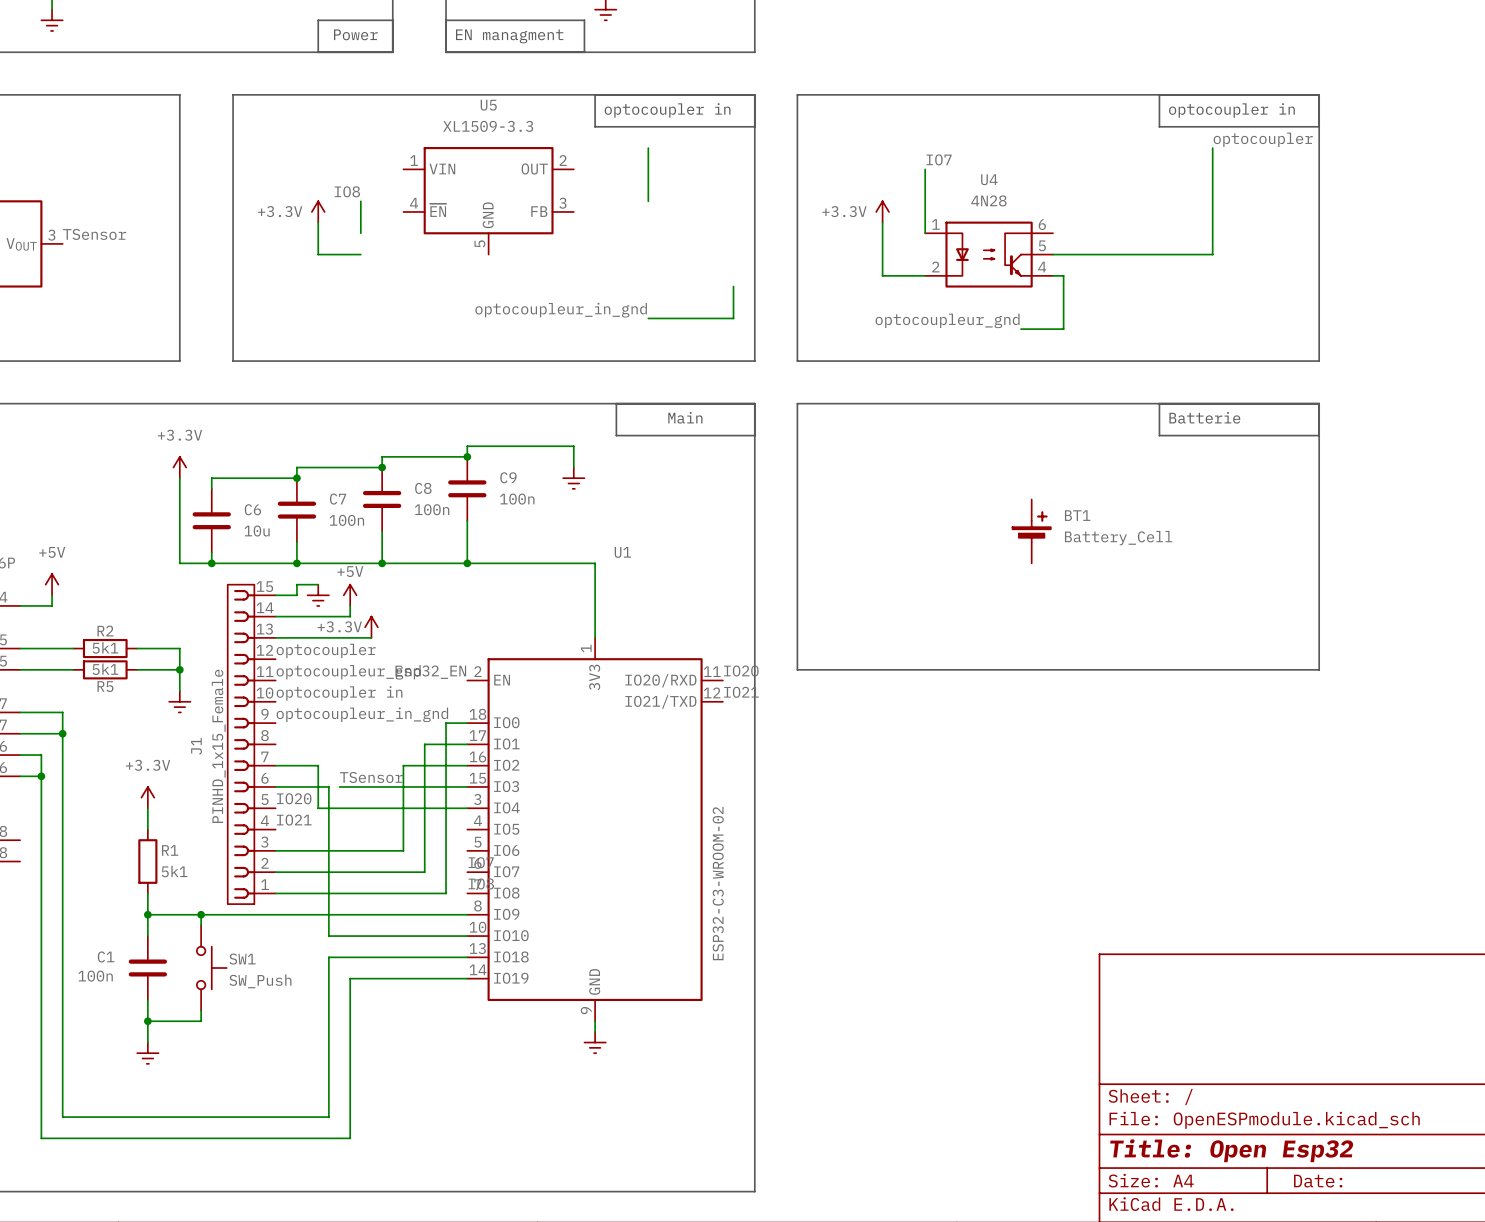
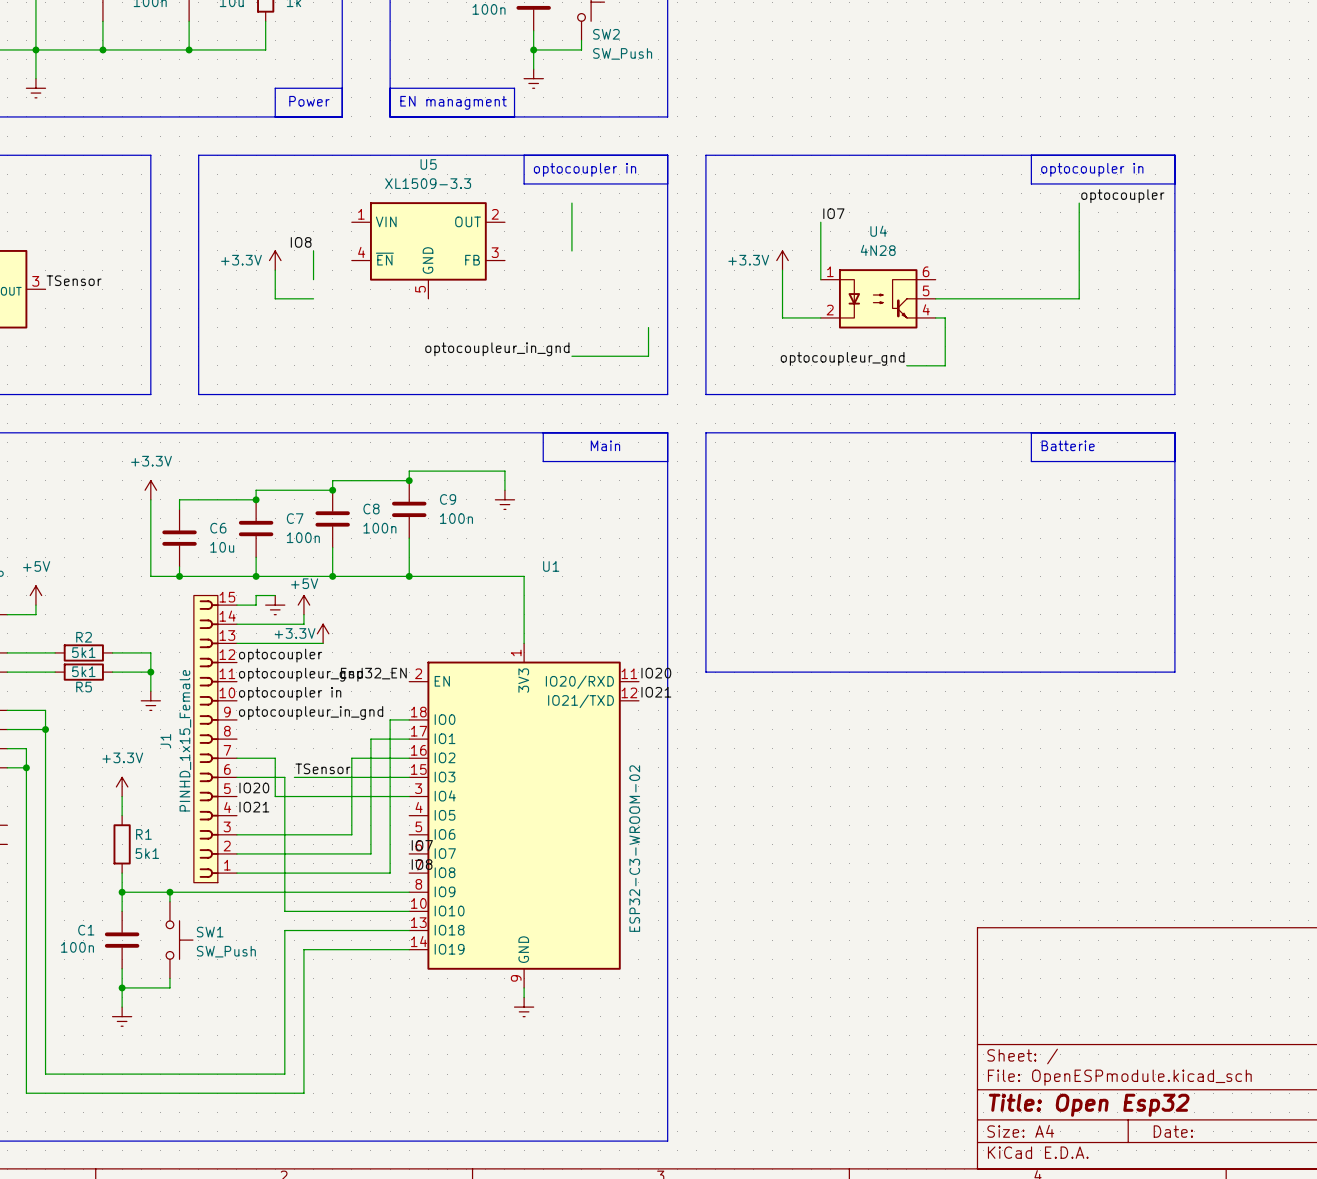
BT1: Battery_Cell (1031, 531) -> none

